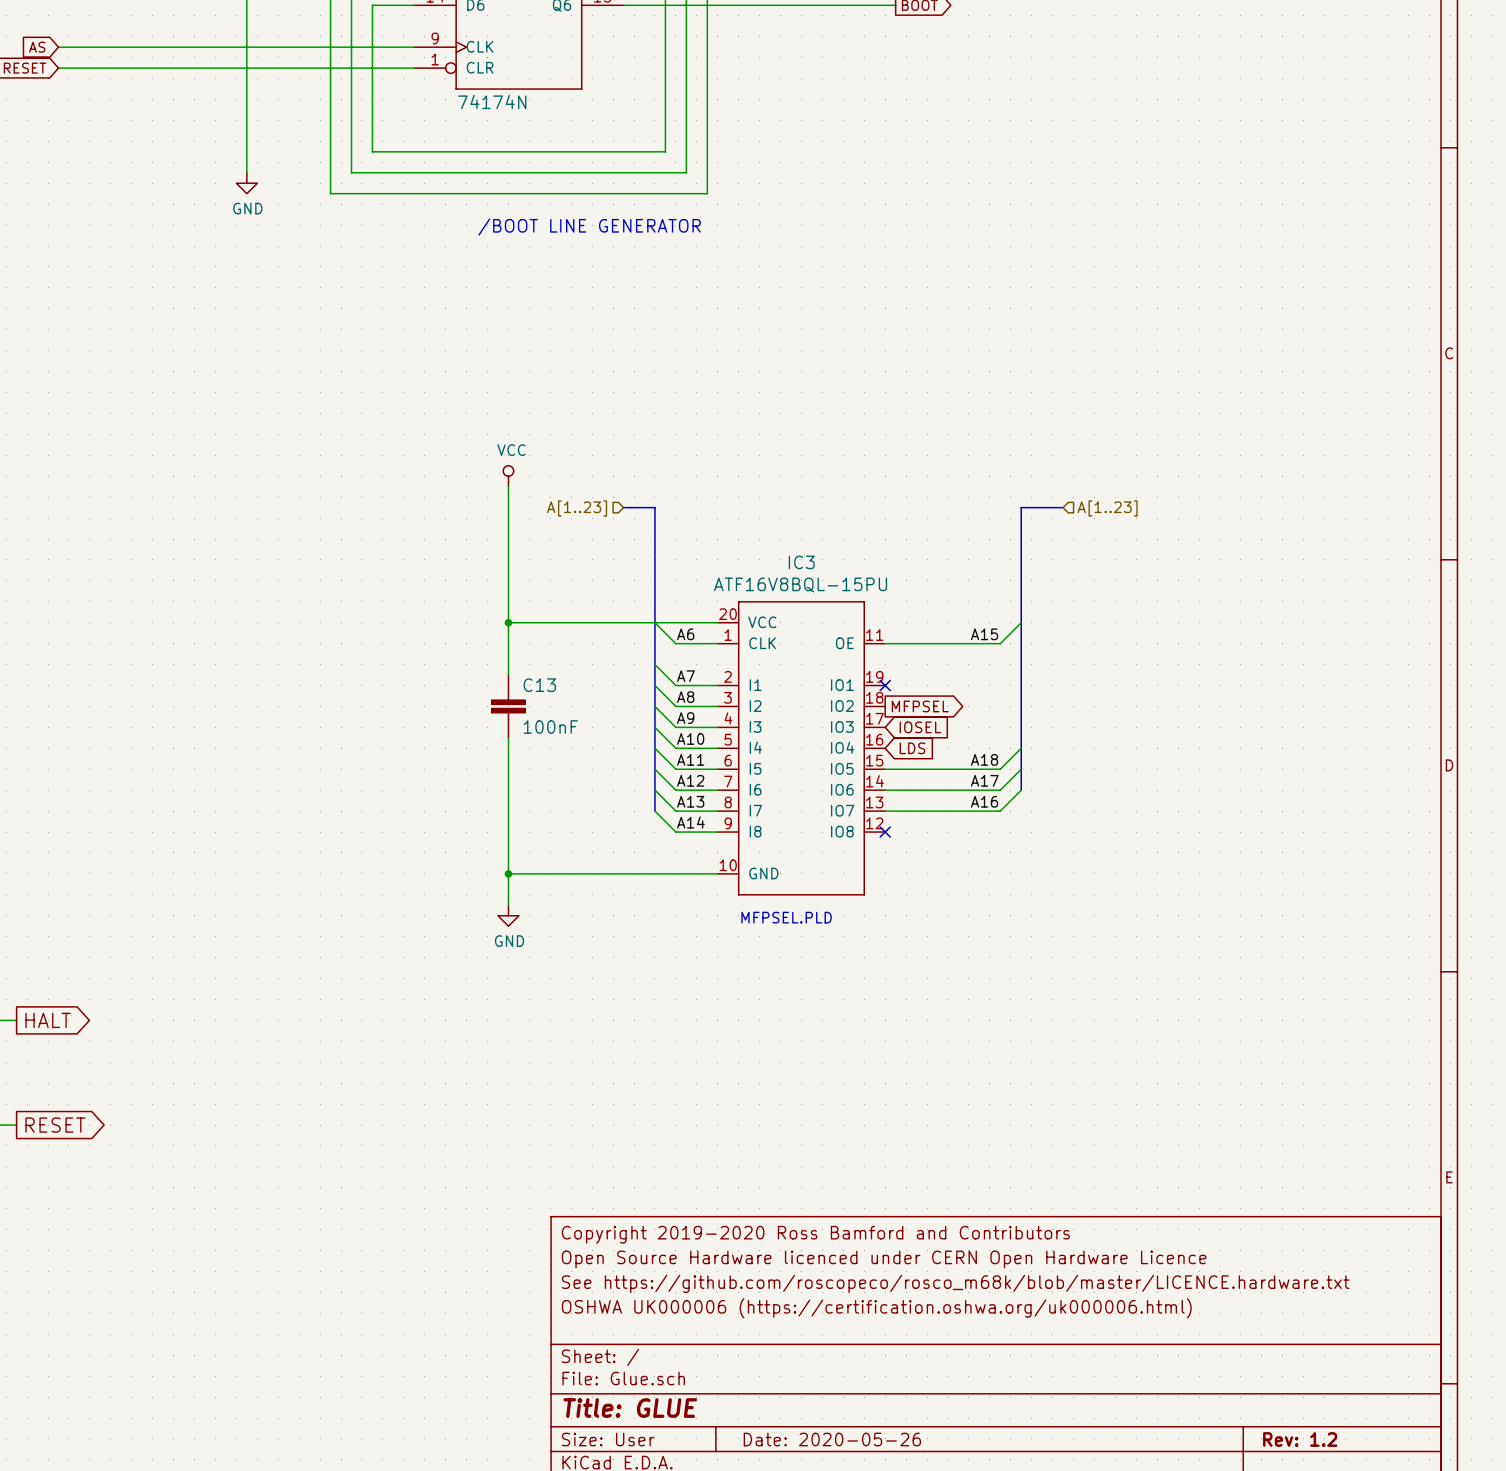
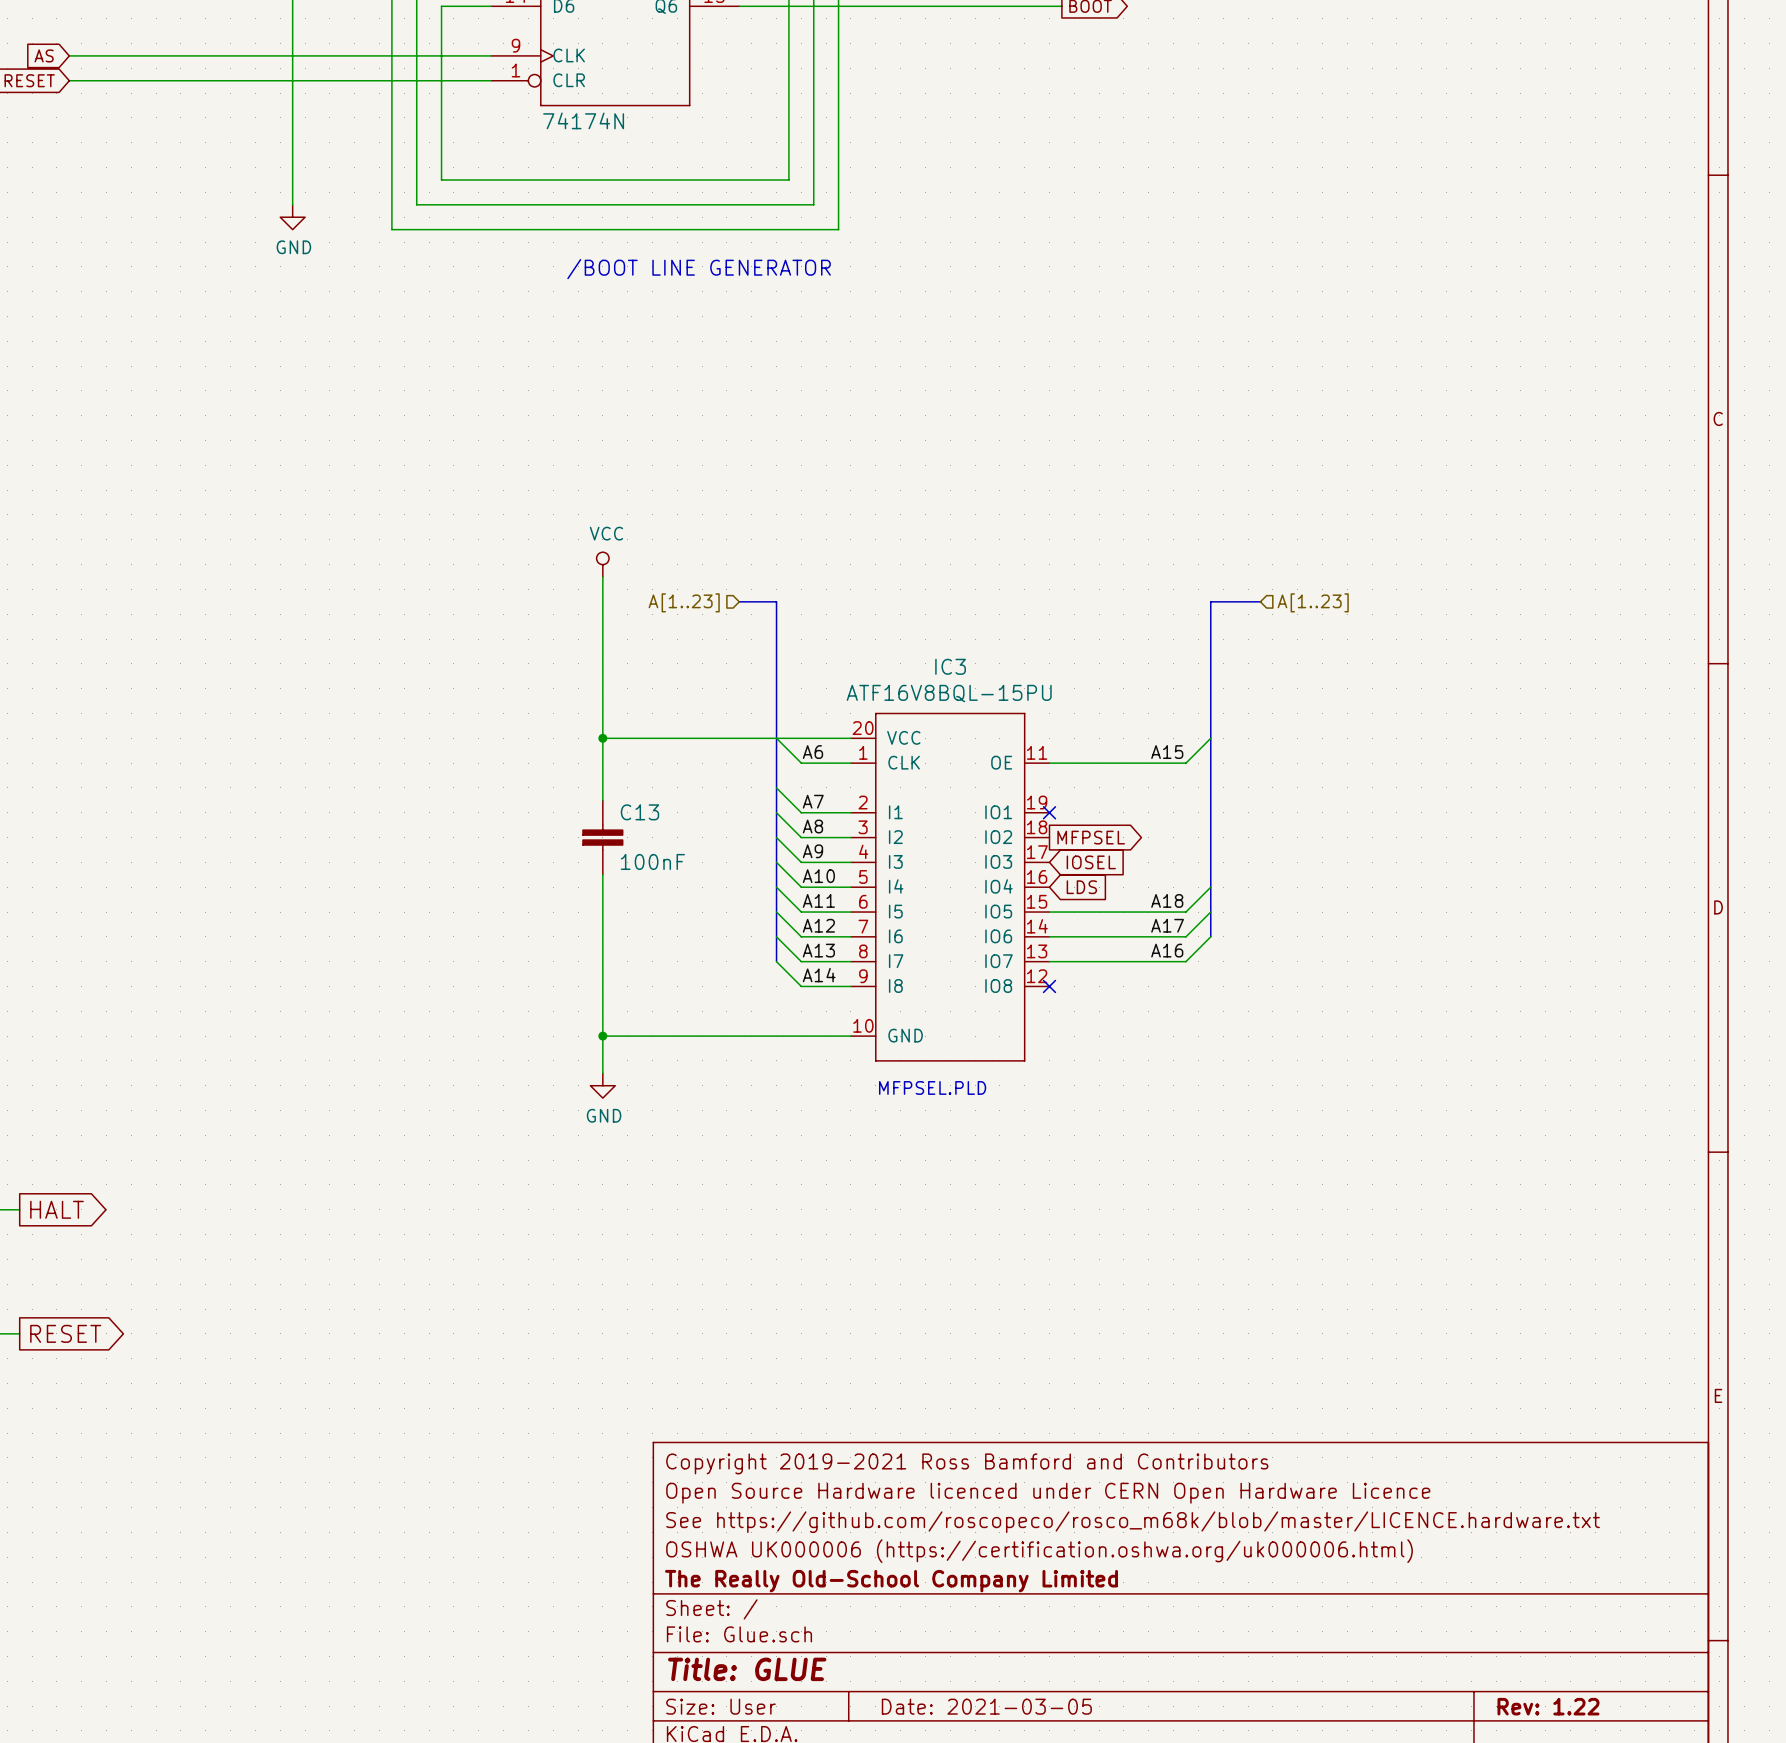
title block: Copyright 2019-2020 Ross Bamford and Contributors (815, 1234) -> Copyright 2019-2021 Ross Bamford and Contributors (967, 1463)
title block: none -> The Really Old-School Company Limited (891, 1581)
title block: Date: 2020-05-26 (832, 1439) -> Date: 2021-03-05 (986, 1706)
title block: Rev: 1.2 (1300, 1439) -> Rev: 1.22 (1548, 1706)

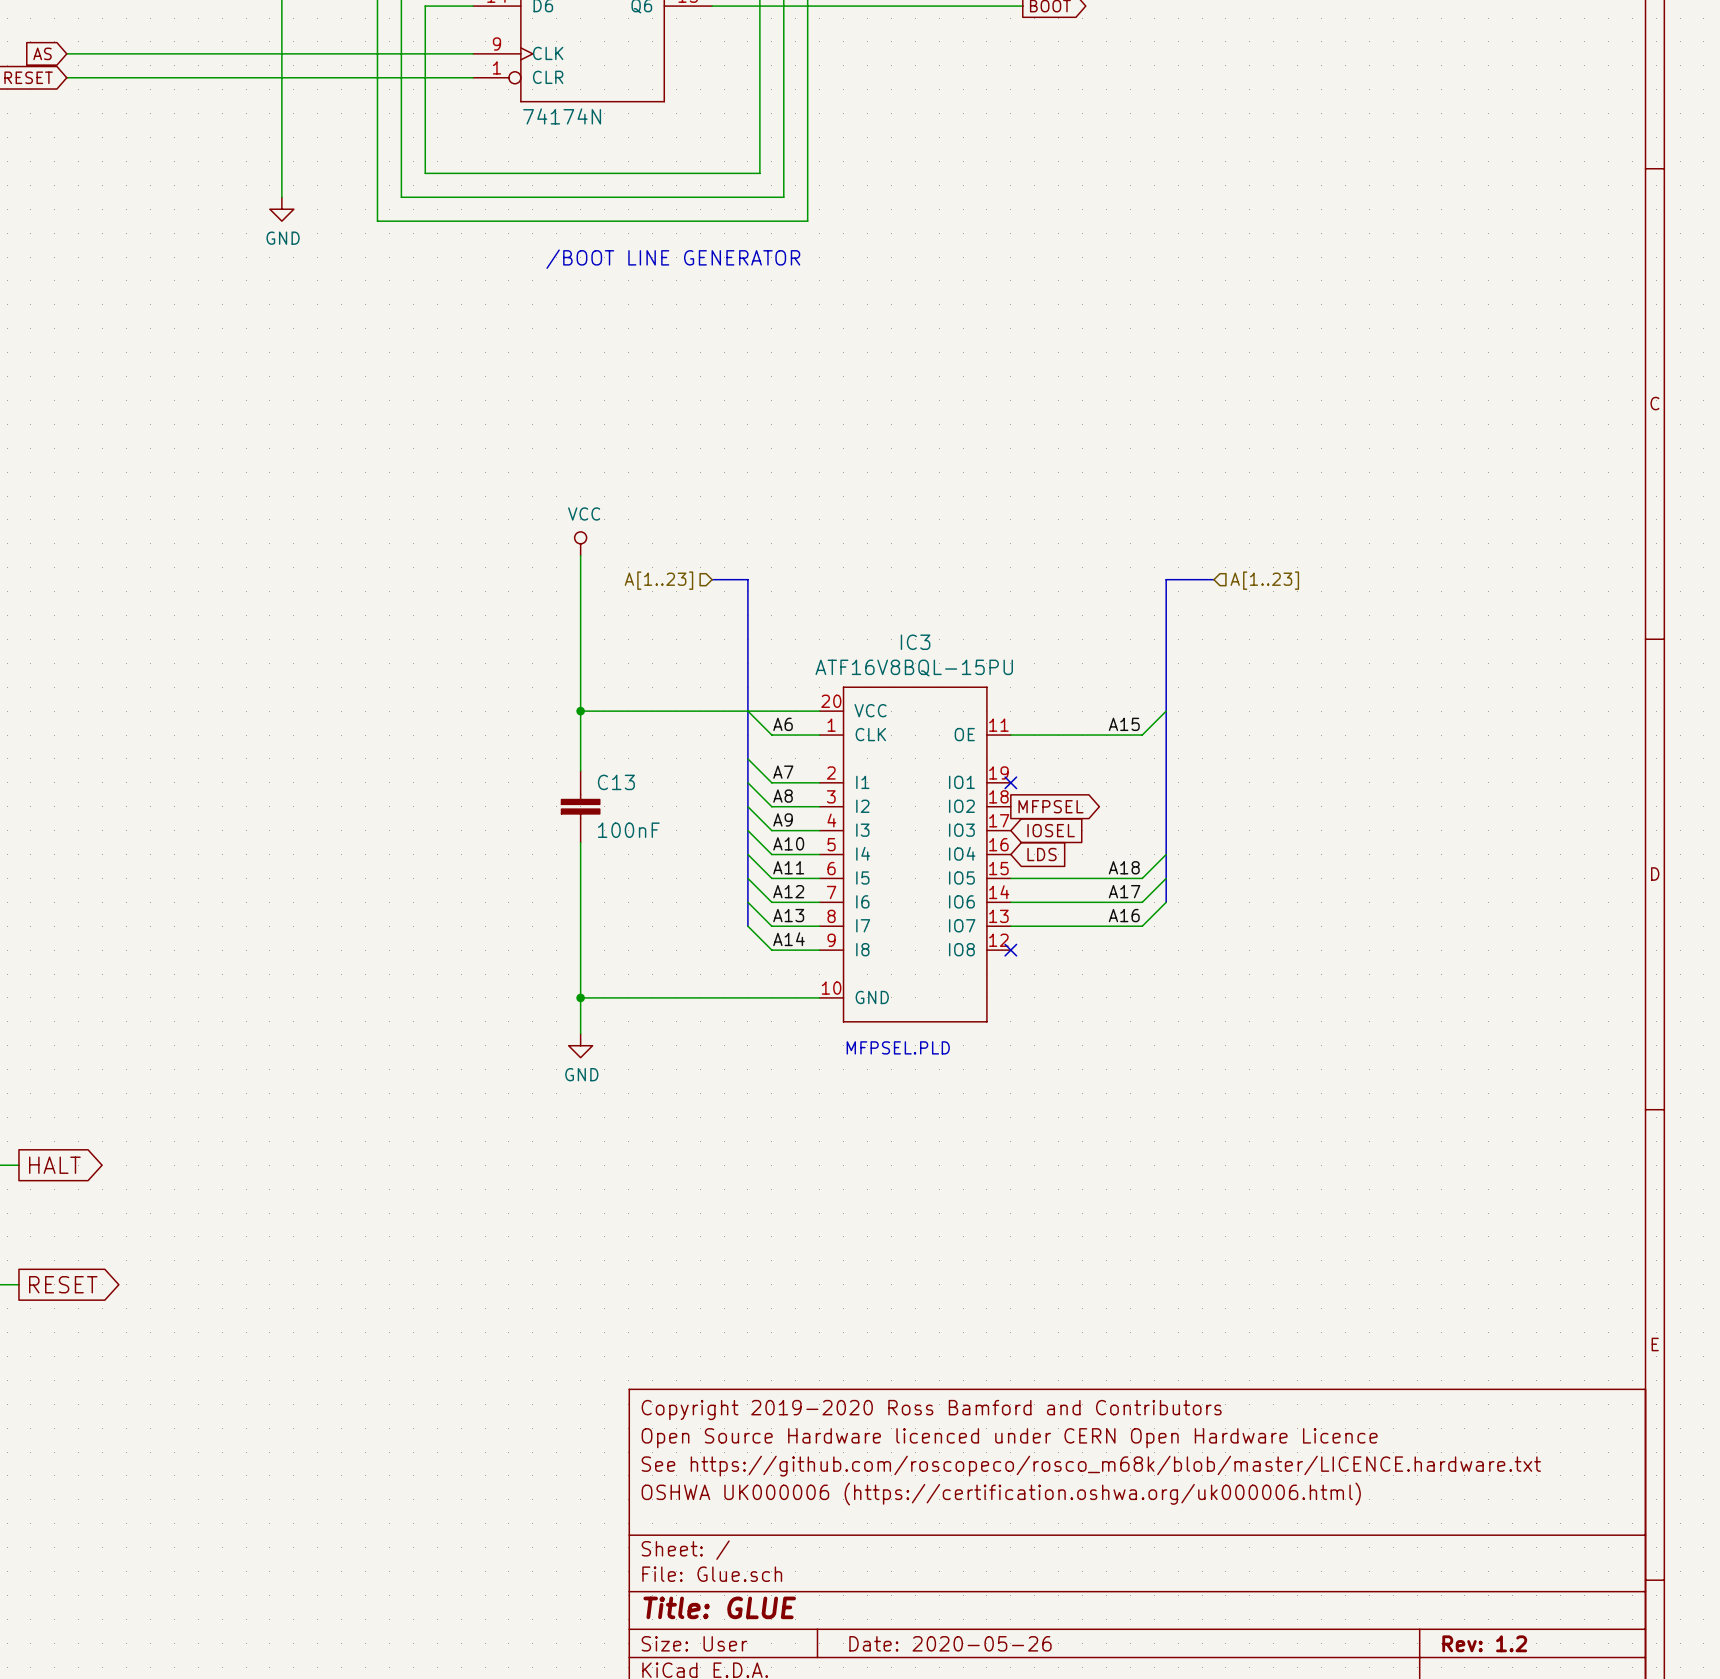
title block: Copyright 2019-2021 Ross Bamford and Contributors (967, 1463) -> Copyright 2019-2020 Ross Bamford and Contributors (931, 1409)
title block: The Really Old-School Company Limited (891, 1581) -> none
title block: Date: 2021-03-05 (986, 1706) -> Date: 2020-05-26 (950, 1643)
title block: Rev: 1.22 (1548, 1706) -> Rev: 1.2 (1484, 1643)

